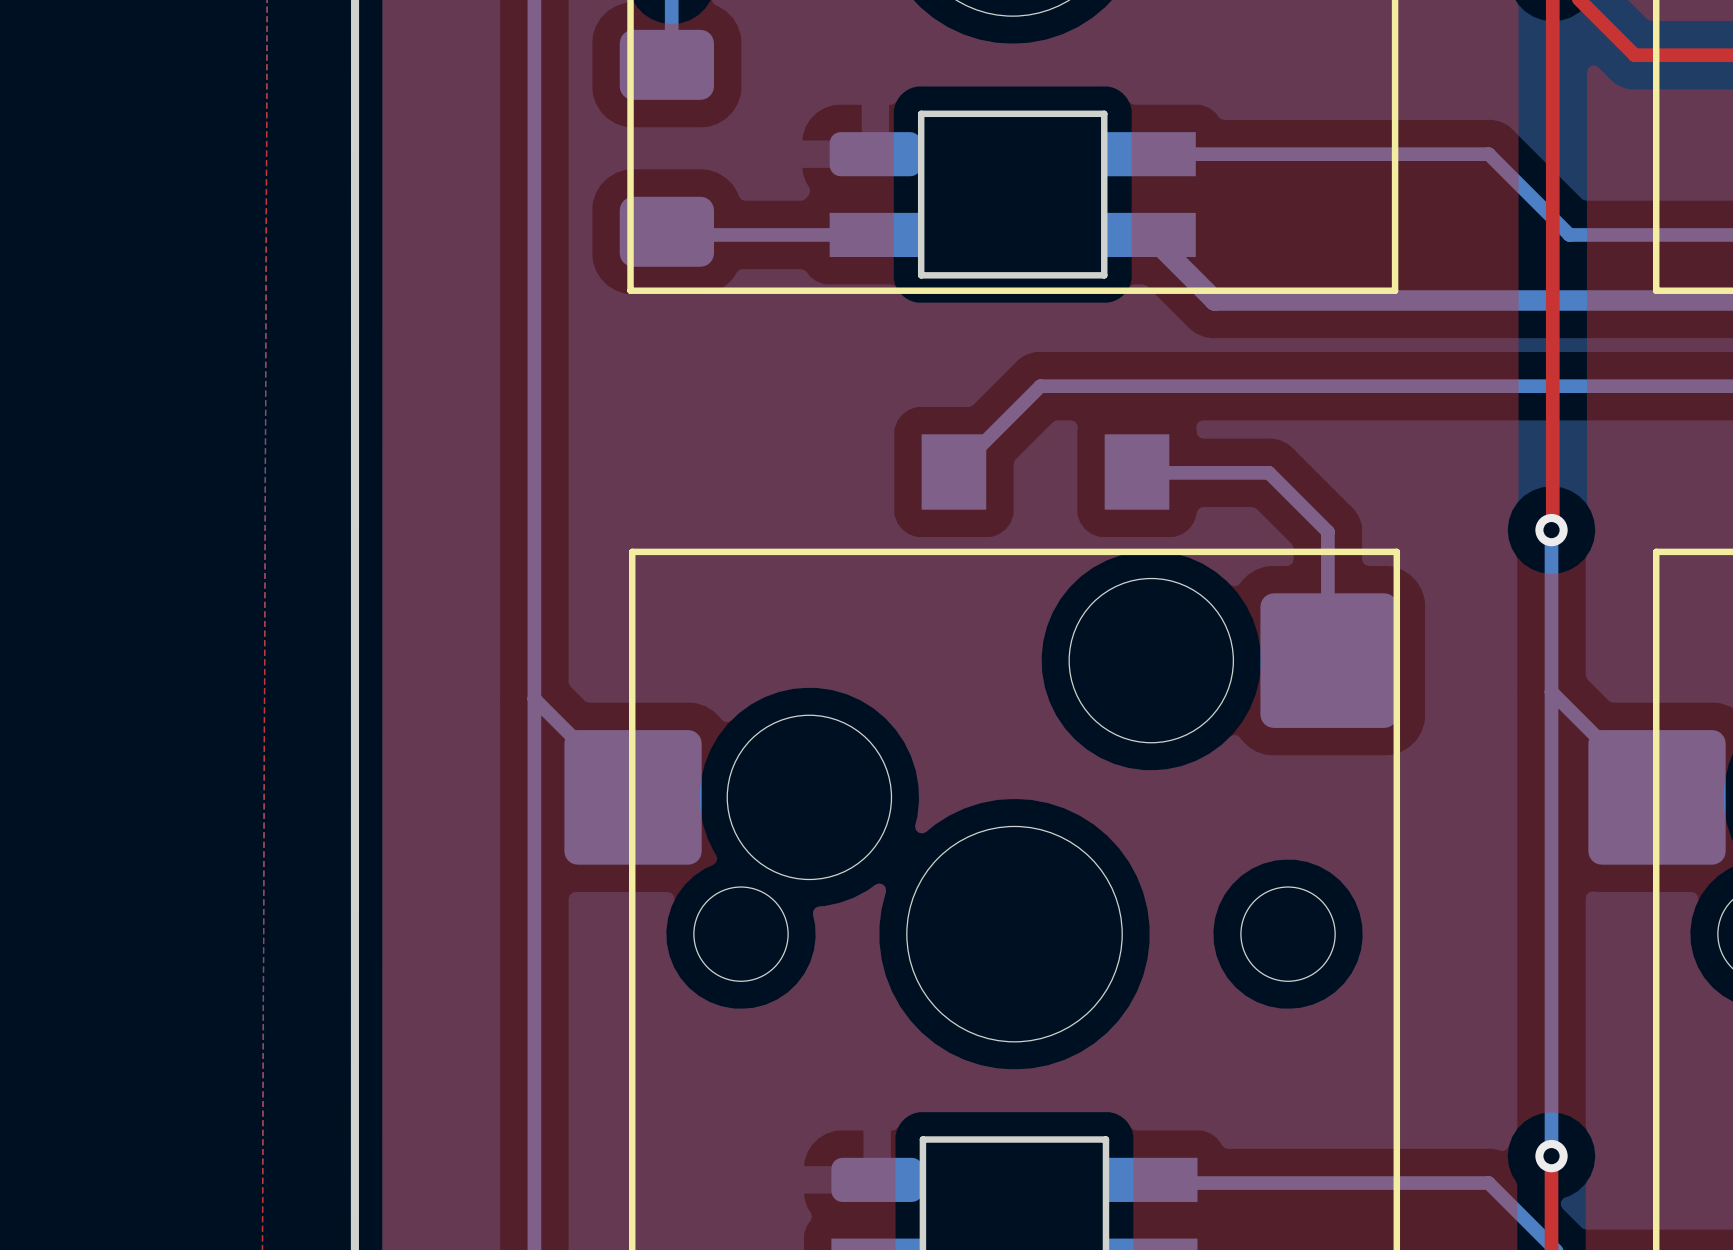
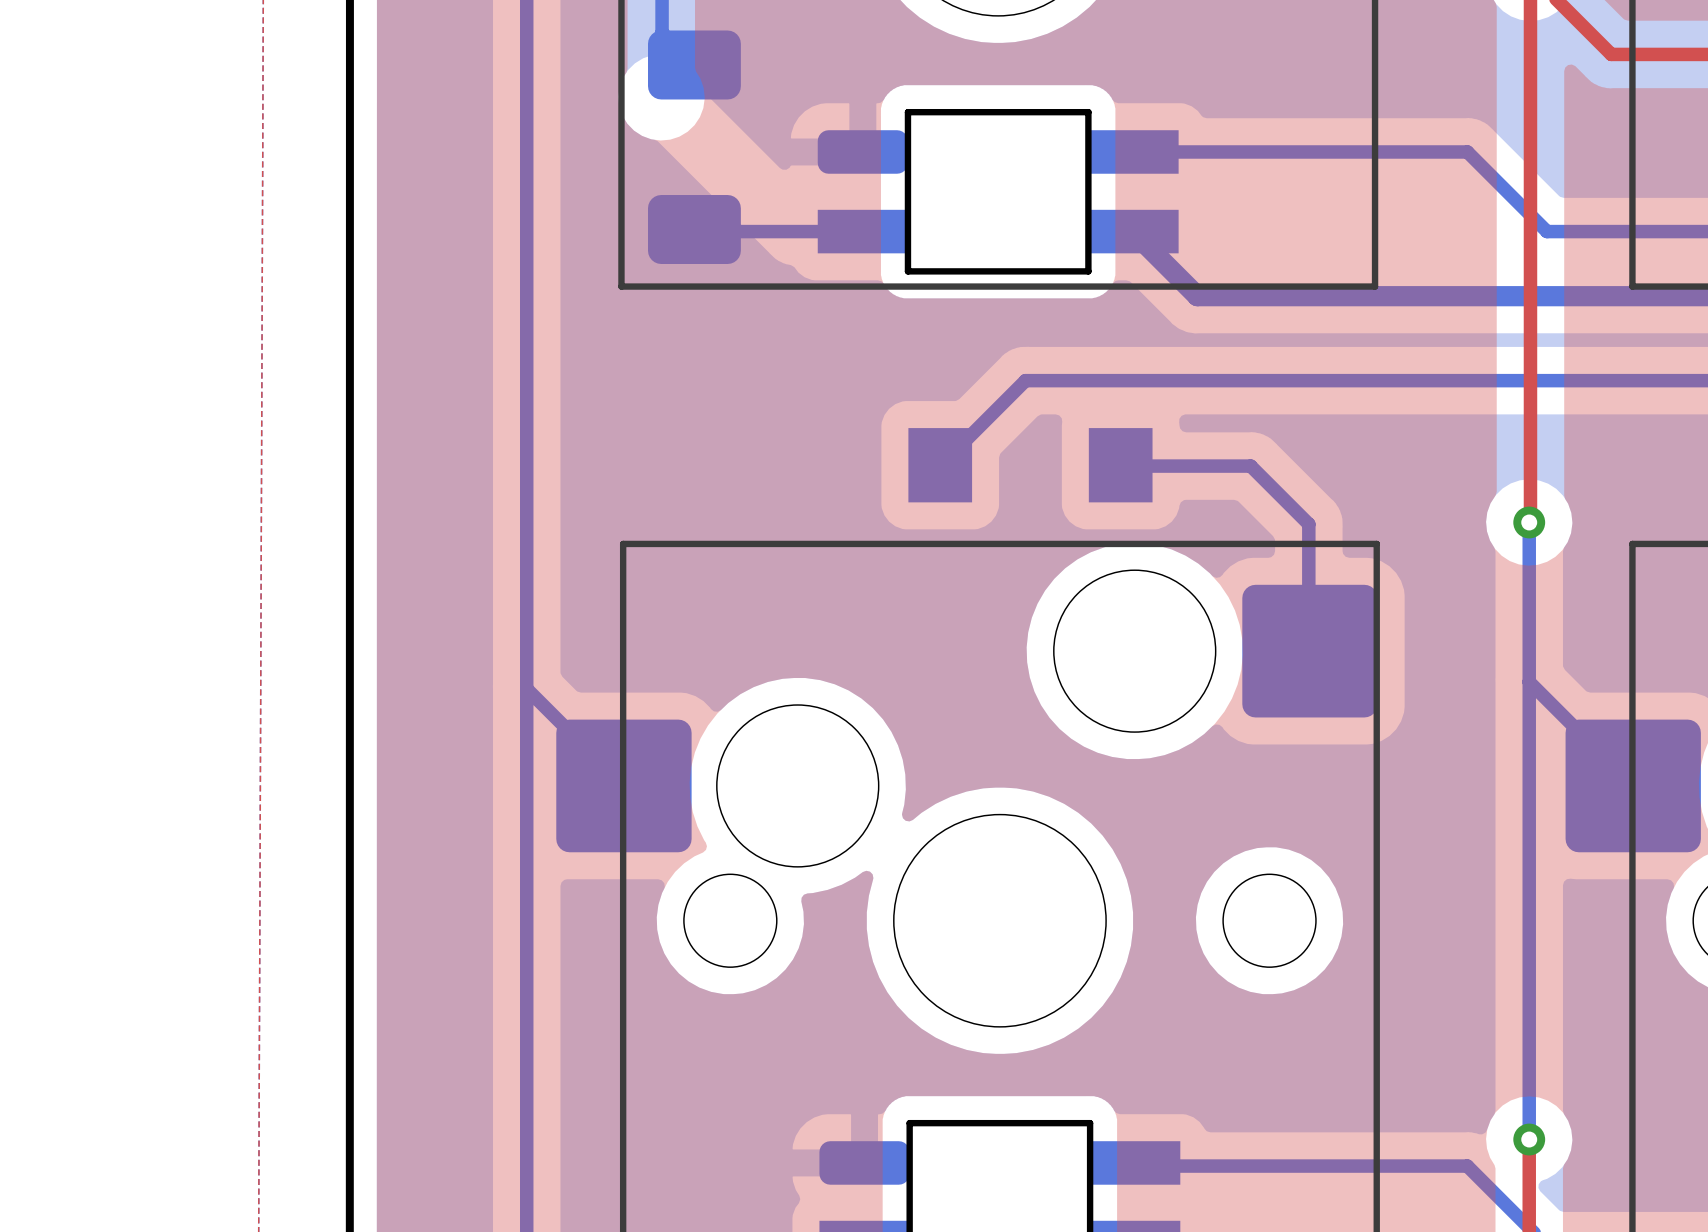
part position: (666, 148) -> (694, 147)

